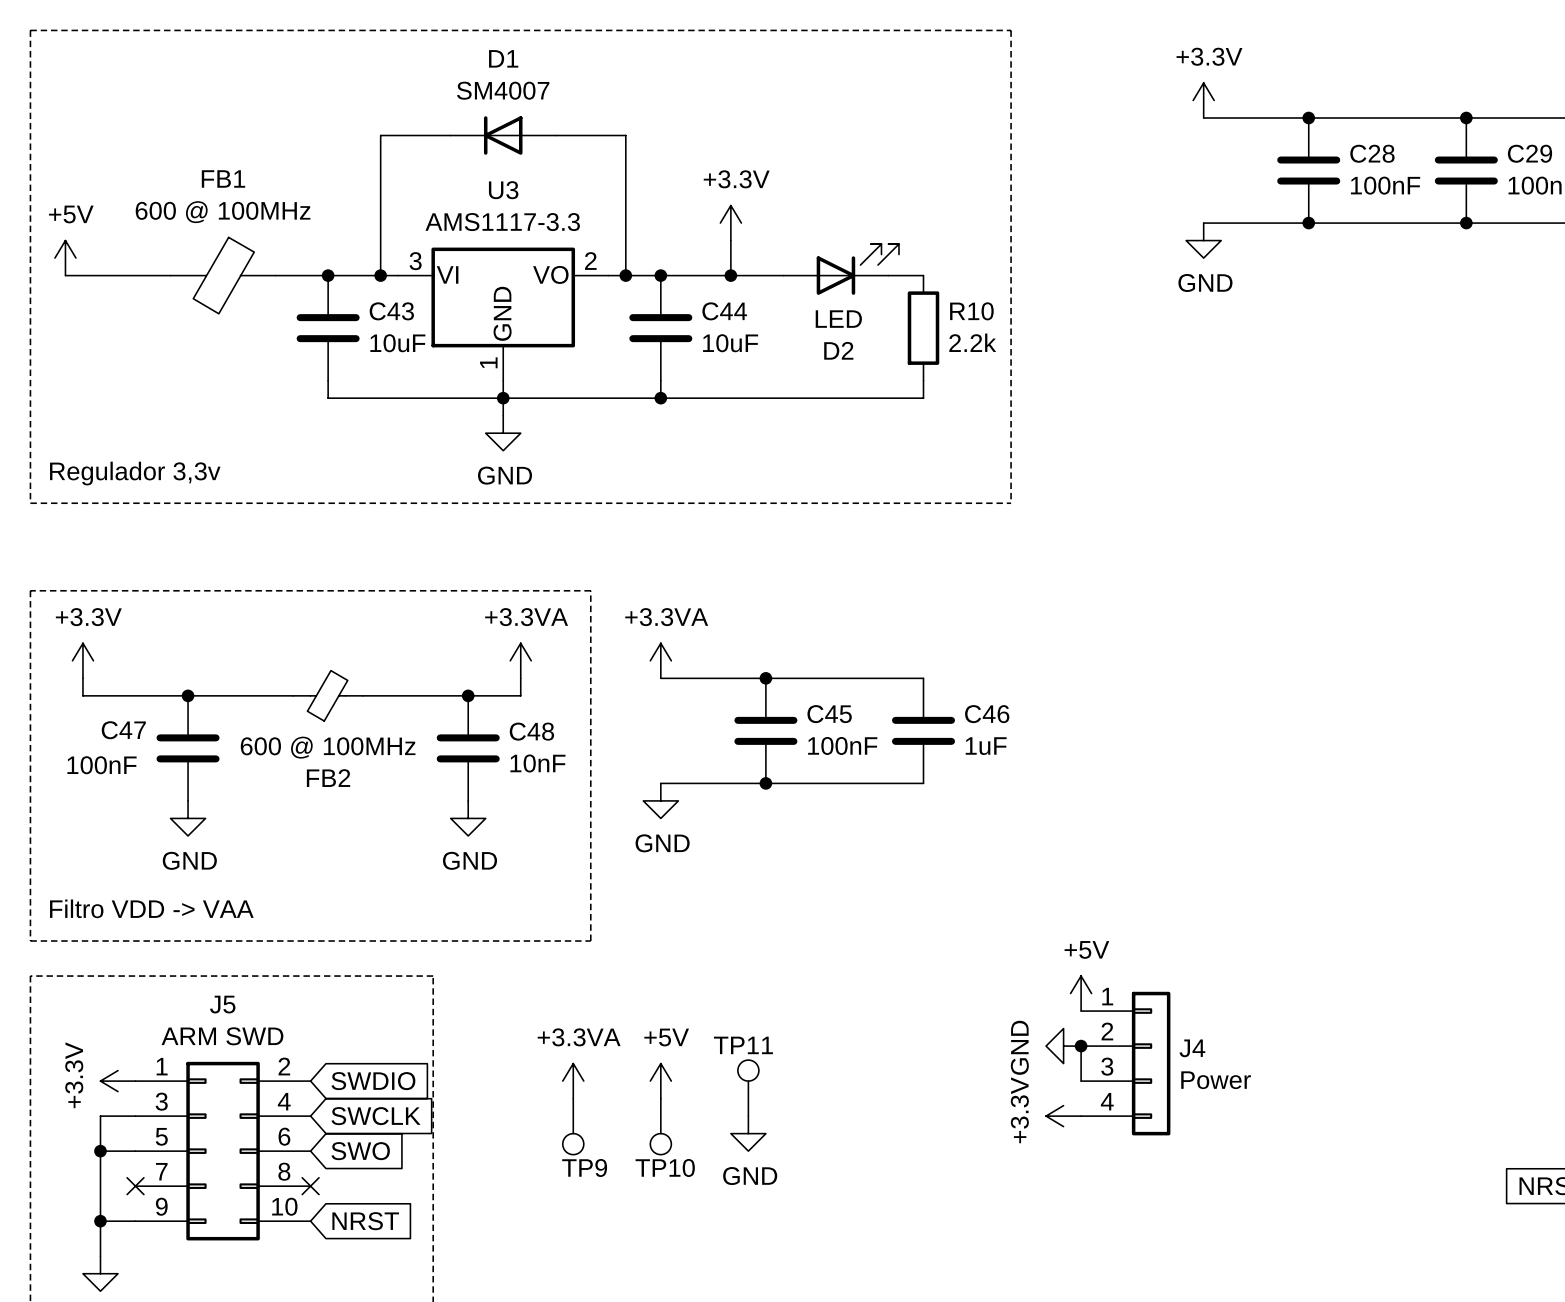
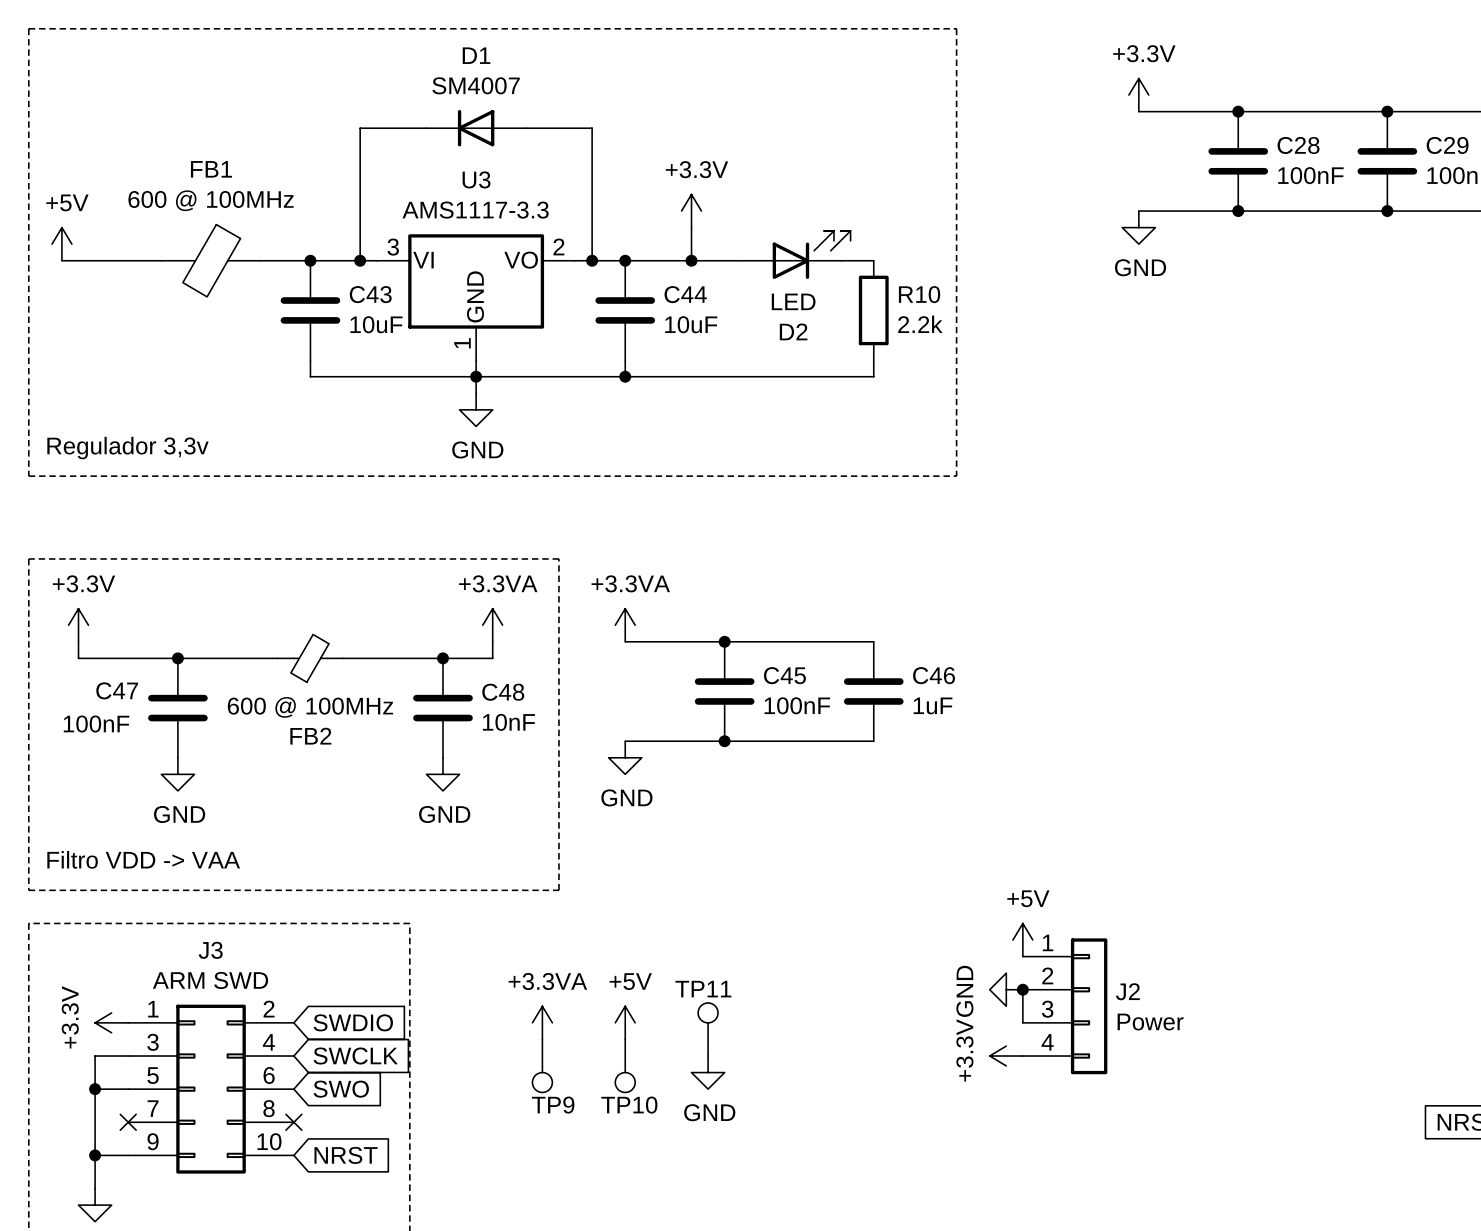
J5 name: J5 (222, 1004) -> J3 (210, 950)
J4 name: J4 (1192, 1048) -> J2 (1127, 991)

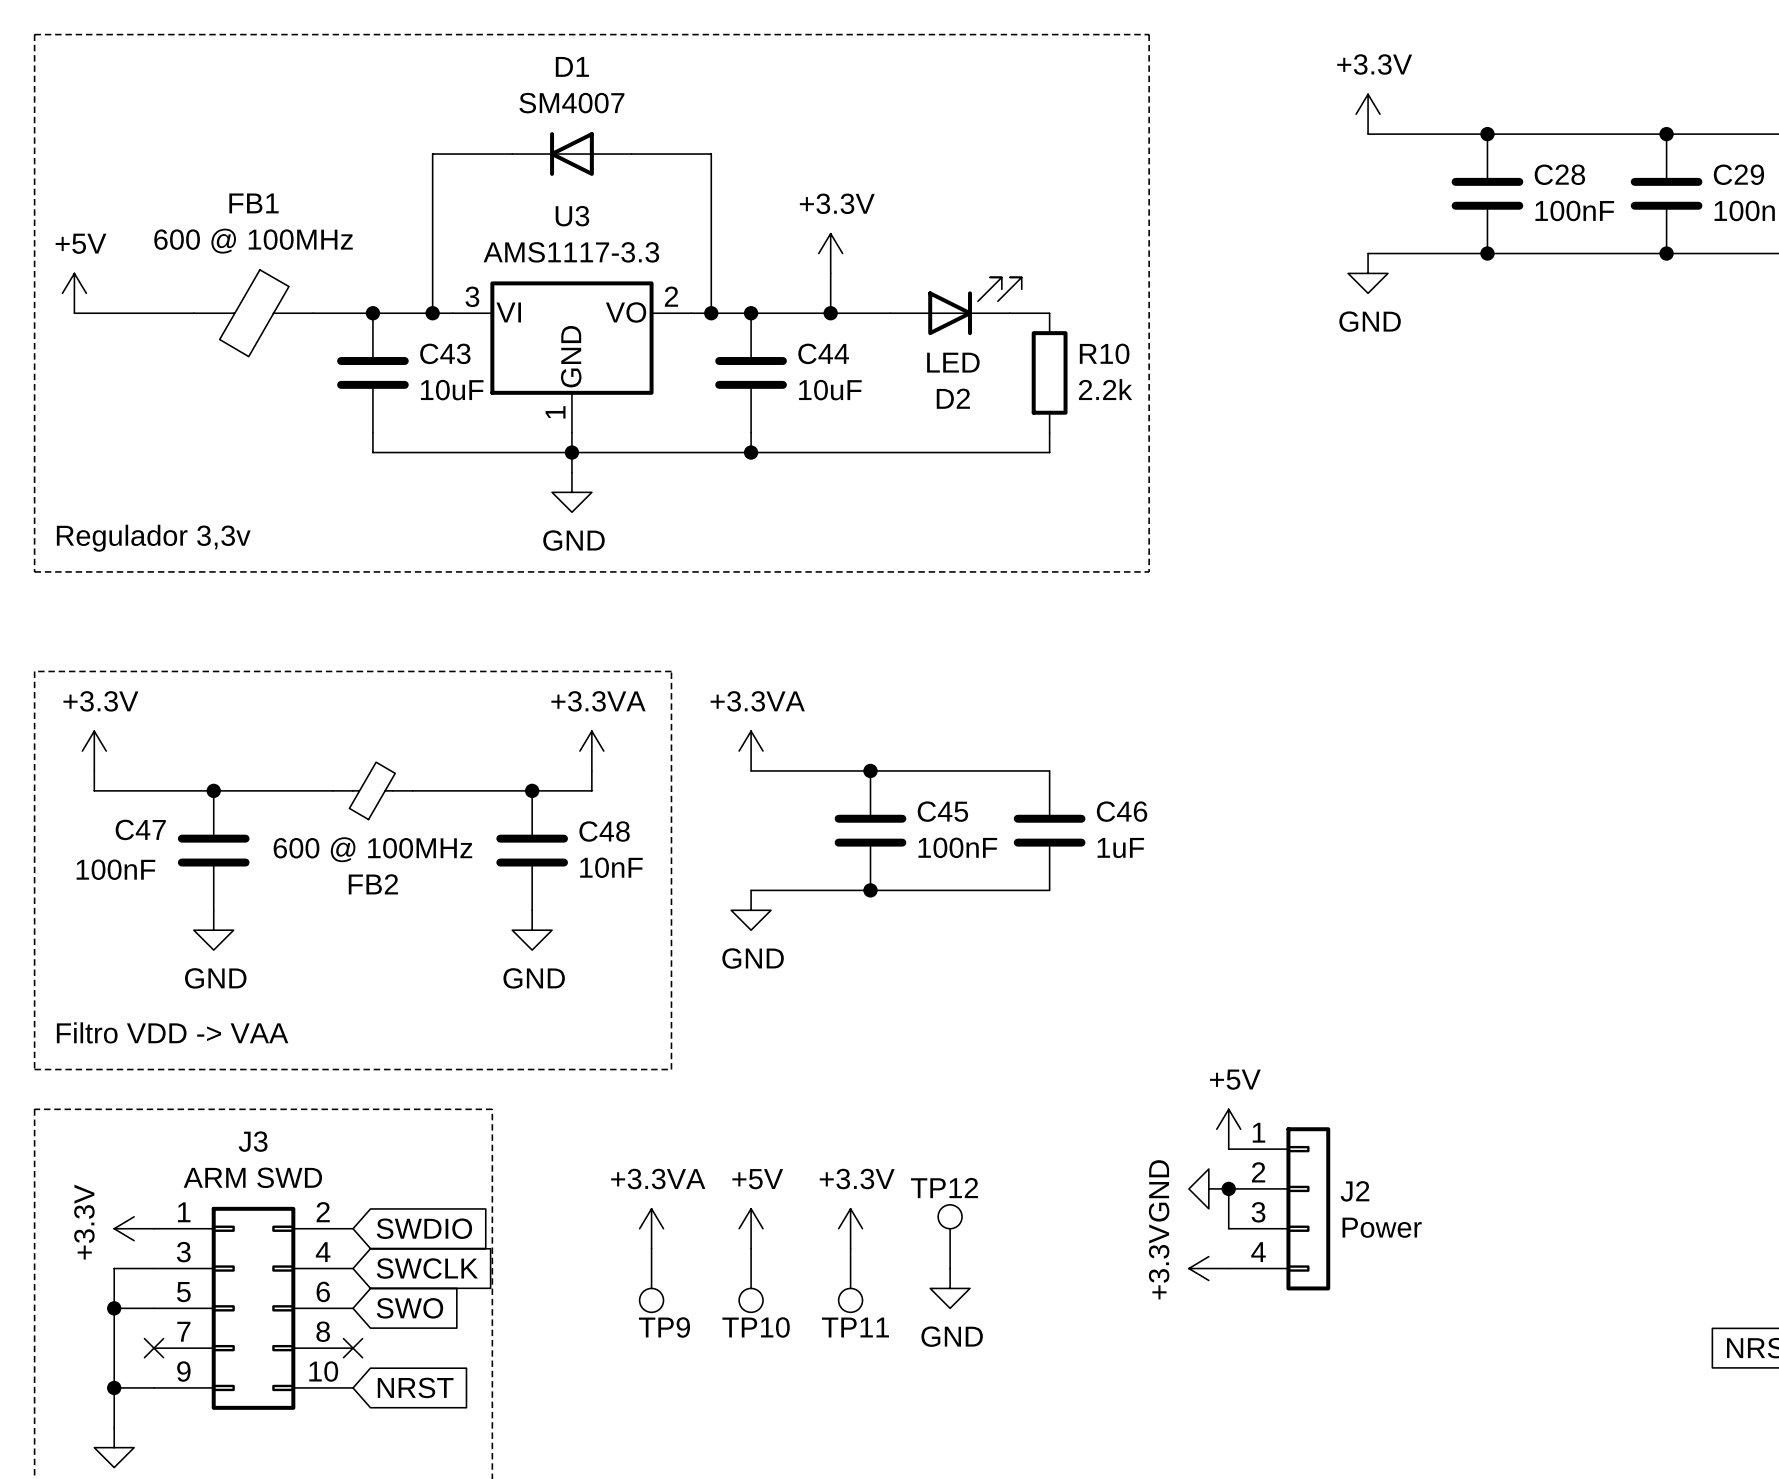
TP11 rotation: 0° (708, 1012) -> 180° (850, 1300)
power symbol: none -> +3.3V (850, 1228)
TP11 position: (708, 1029) -> (850, 1280)
TP12: none -> (950, 1236)
power symbol position: GND (708, 1072) -> GND (950, 1288)

